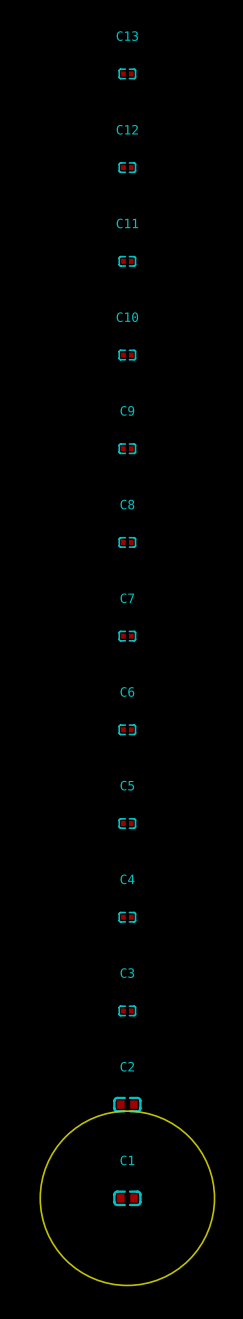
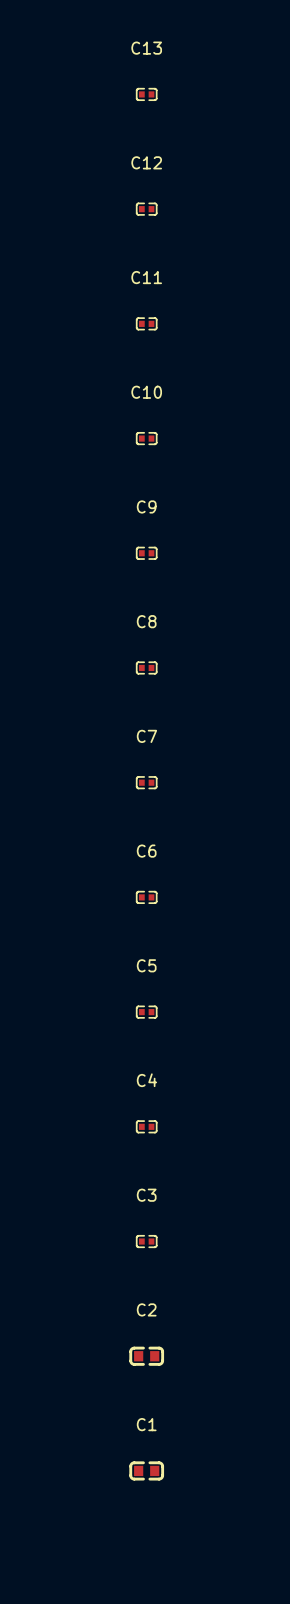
round board edge: [39, 1110, 215, 1286] -> none

